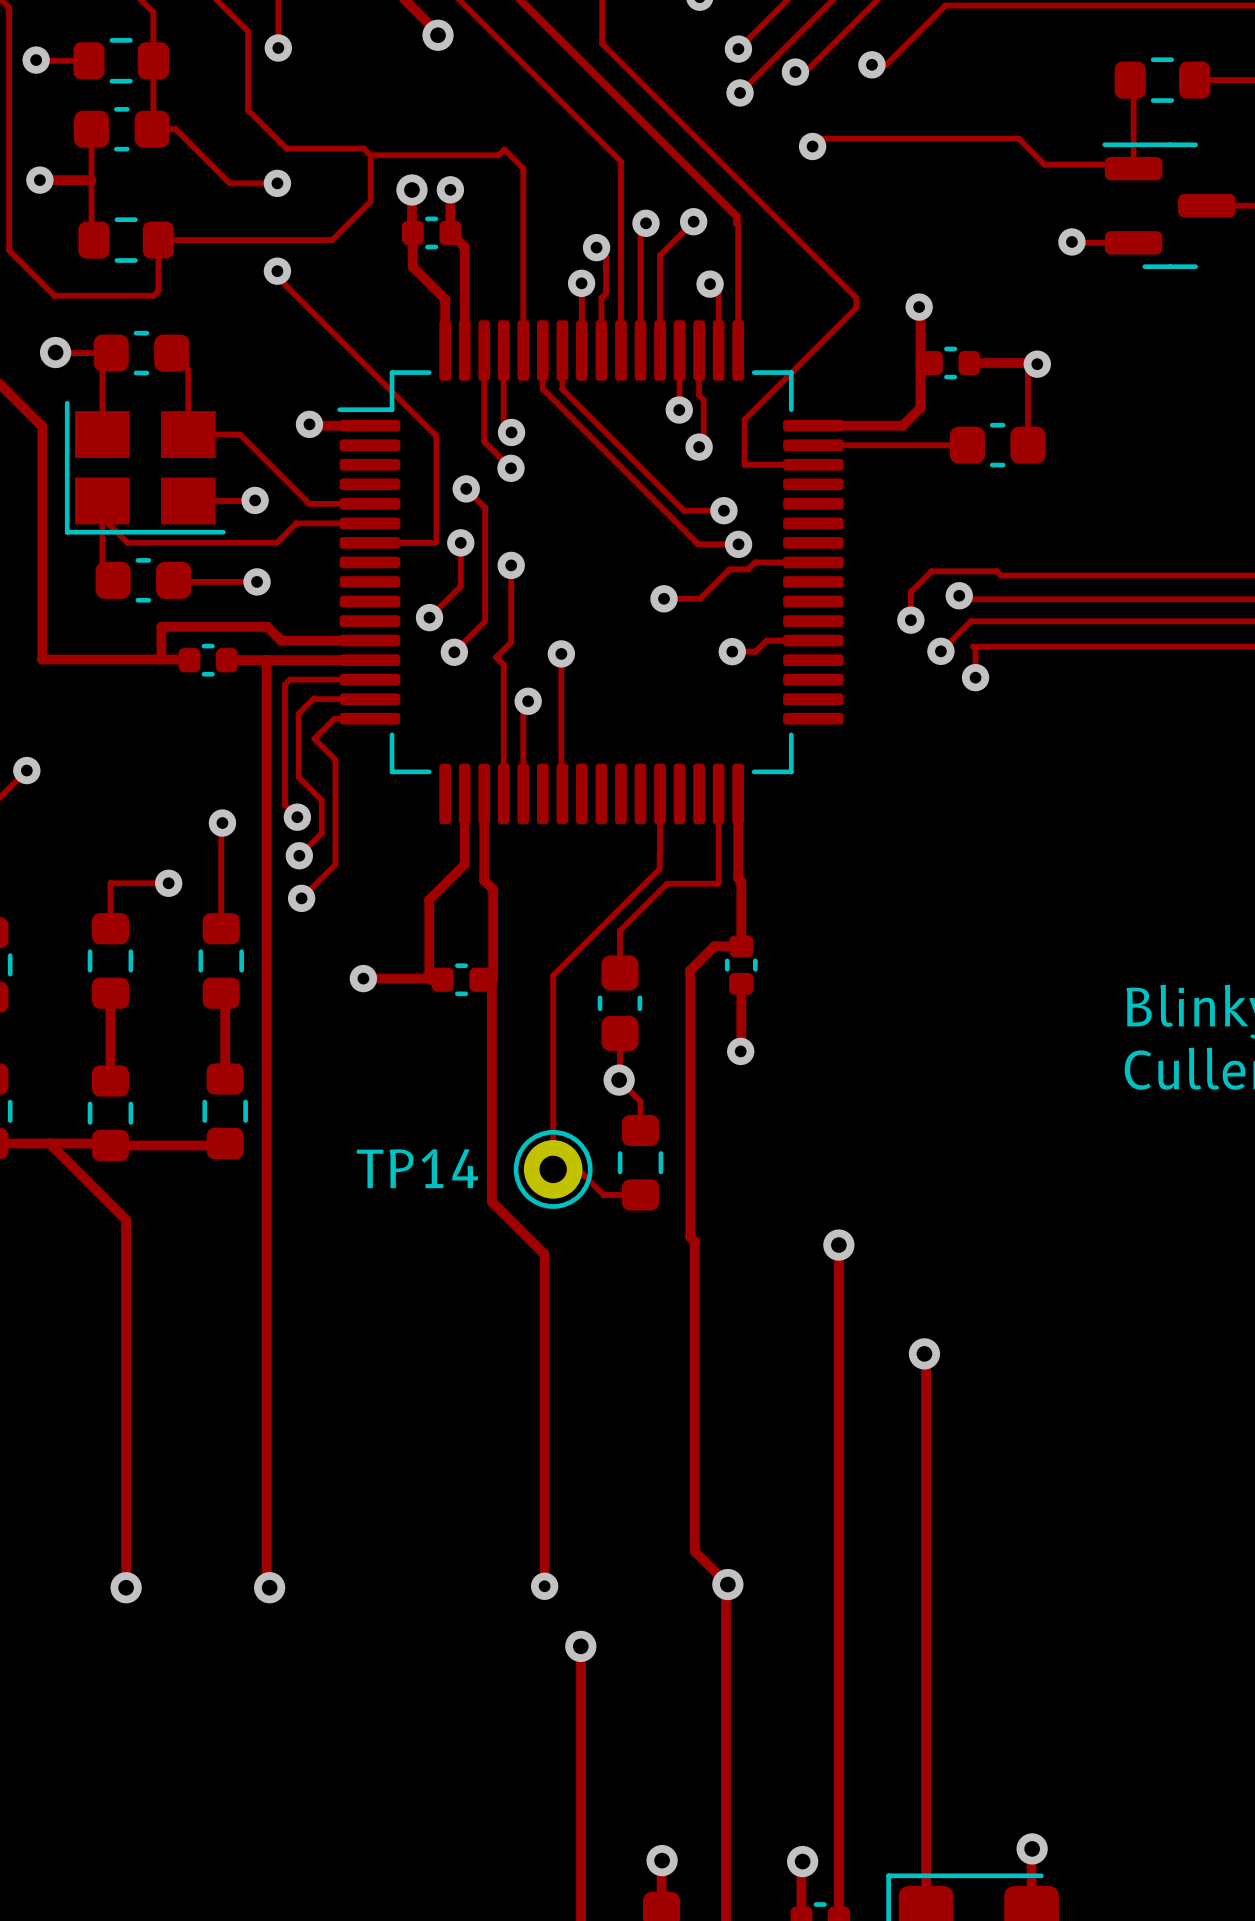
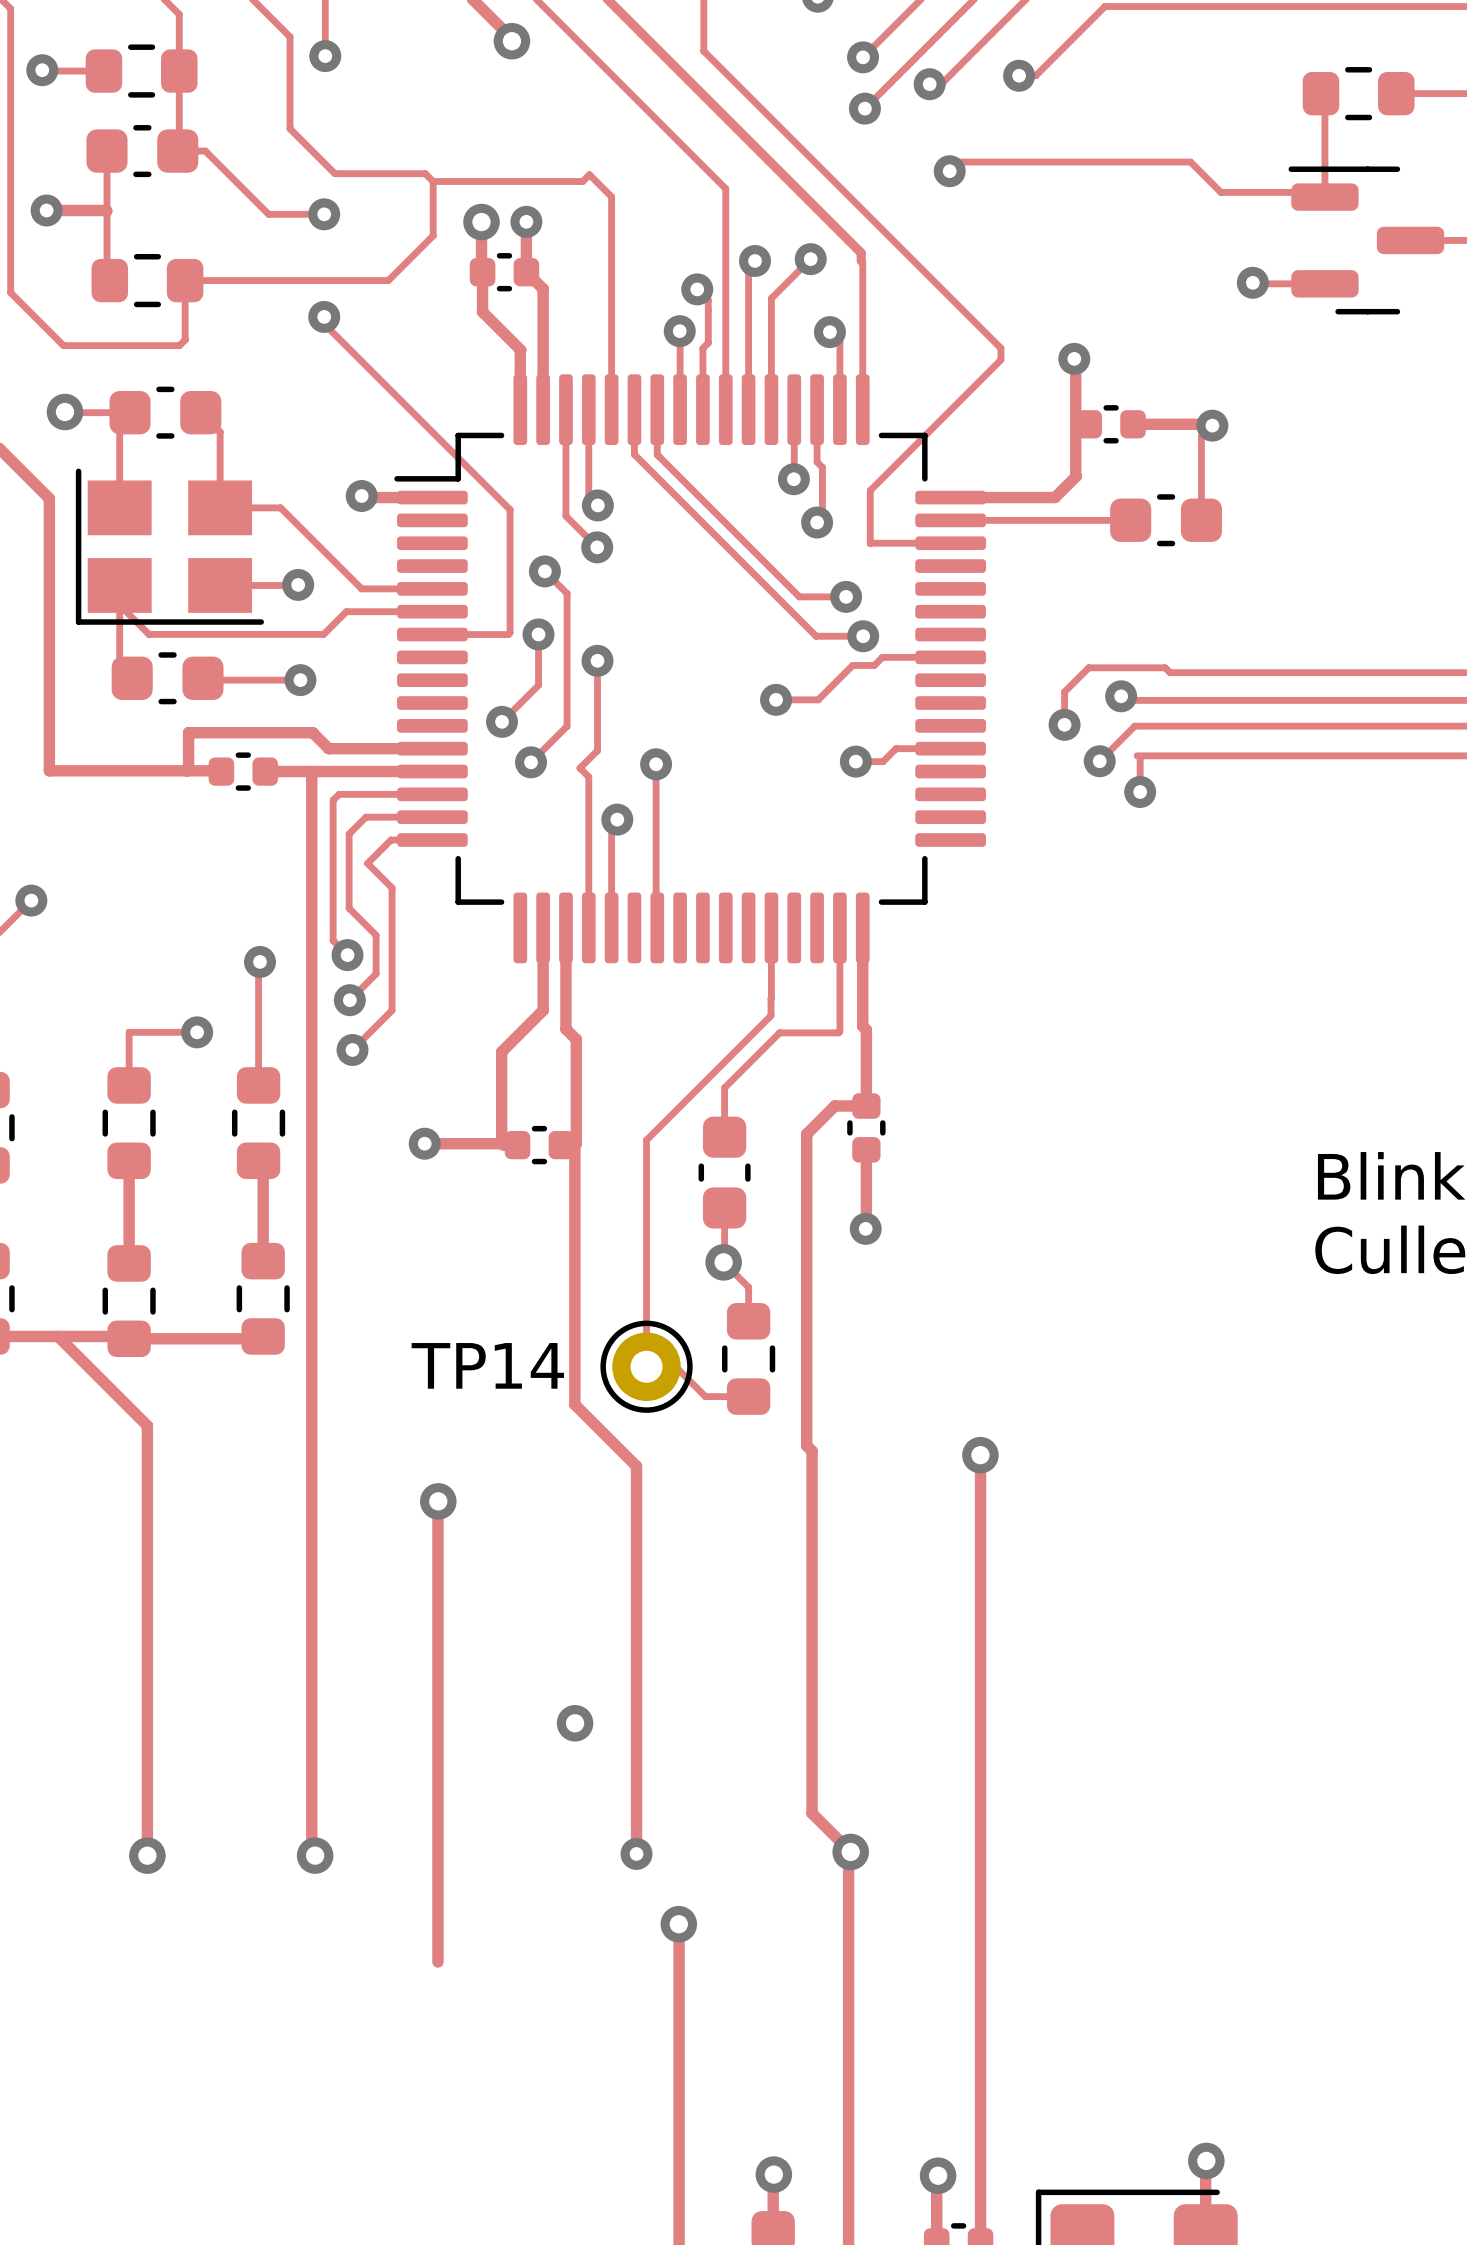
track: none -> (437, 1501) (437, 1962)
via: none -> (438, 1501)
track: (924, 1353) (926, 1355) (926, 1912) -> none
via: (924, 1353) -> none
via: none -> (575, 1723)

